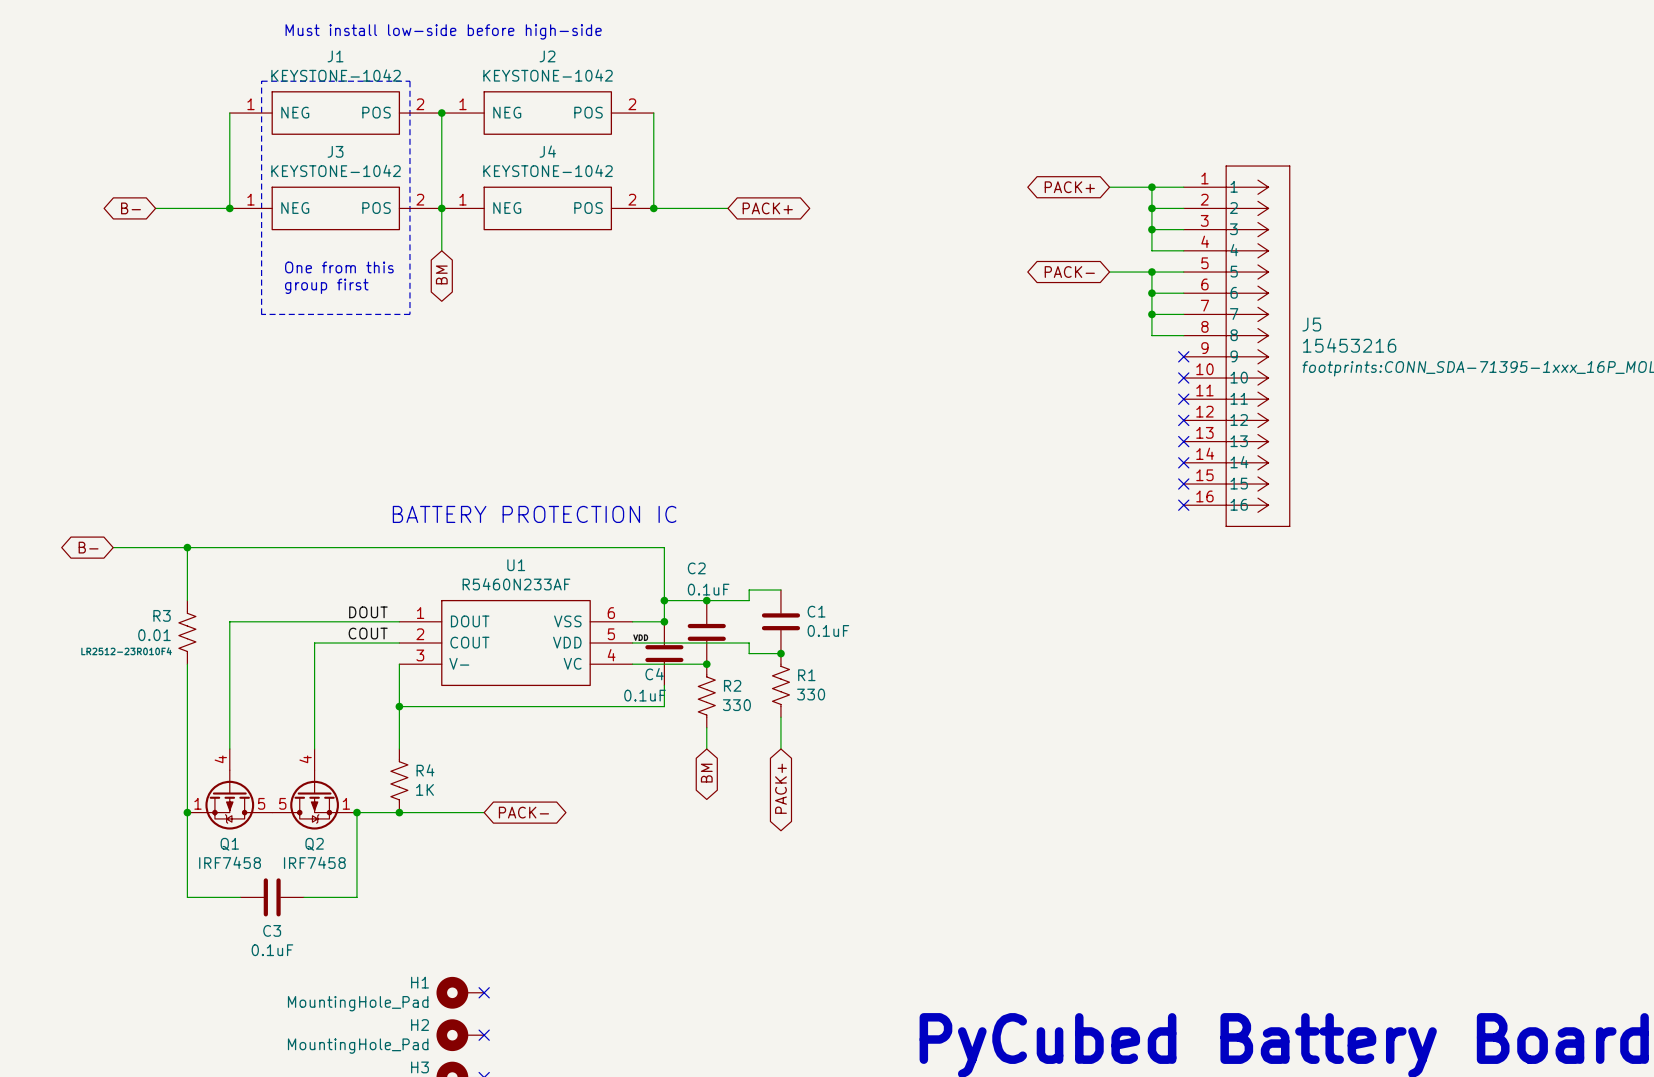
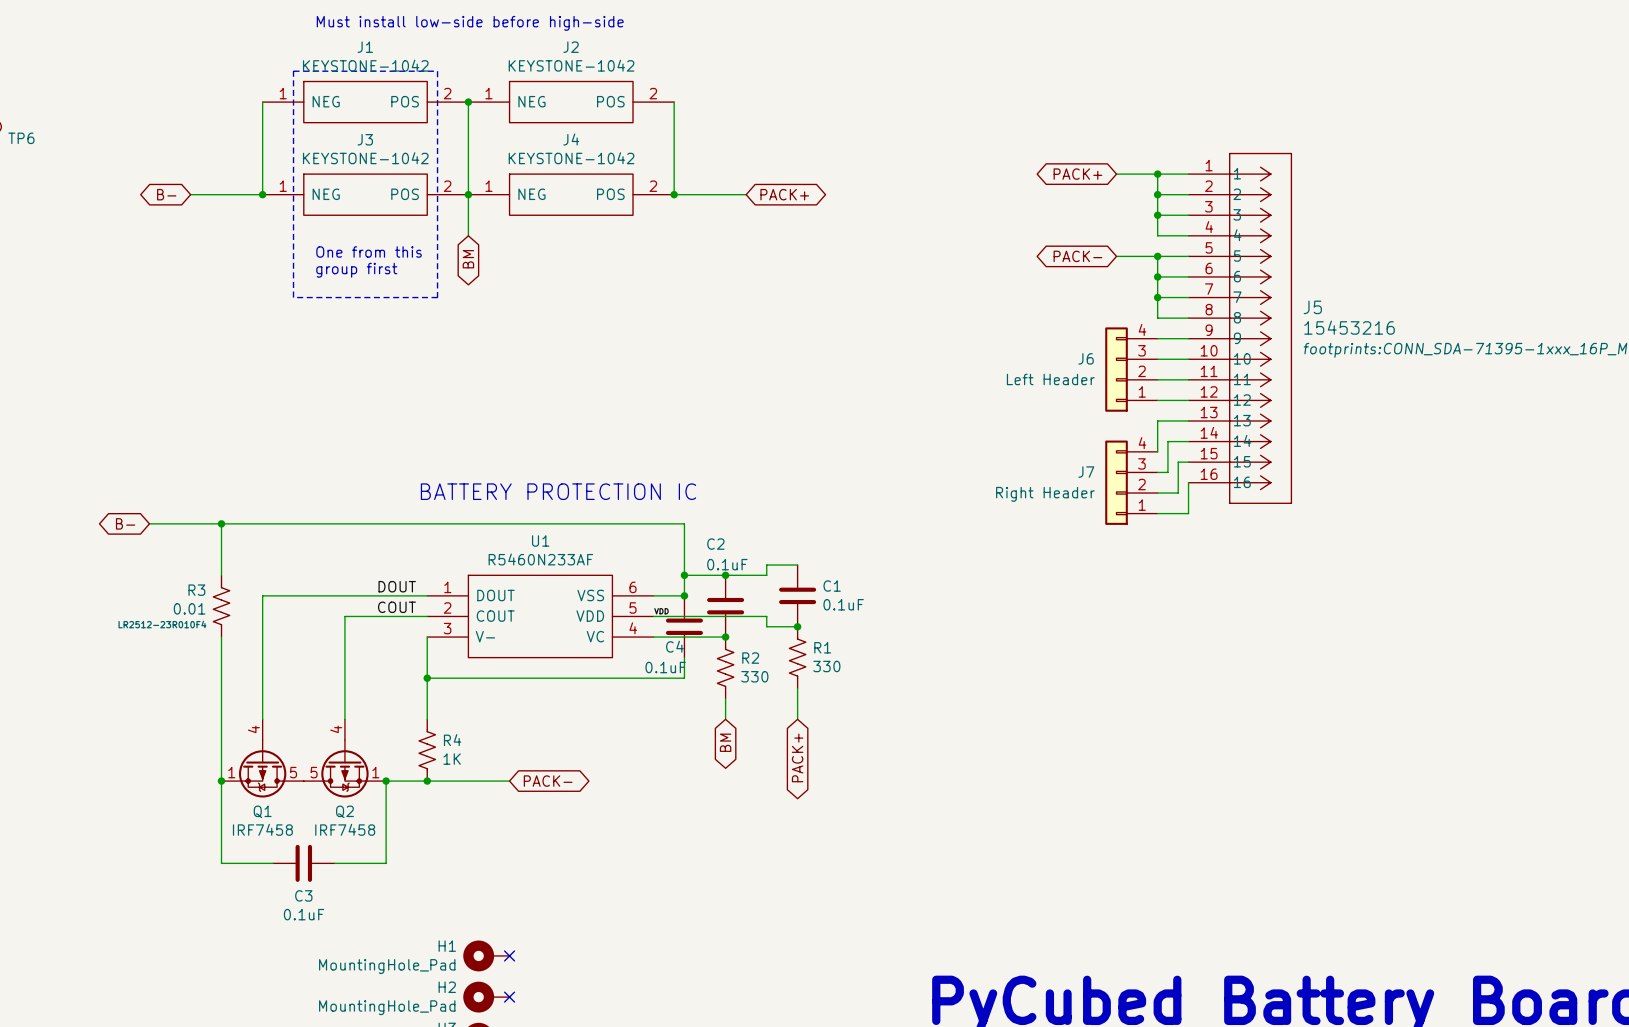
wire: none -> (1157, 338) (1188, 338)
no-connect mark: (1183, 356) -> none
wire: none -> (1157, 359) (1188, 359)
no-connect mark: (1183, 378) -> none
J6: none -> Left Header (1131, 369)
wire: none -> (1157, 379) (1188, 379)
no-connect mark: (1183, 399) -> none
wire: none -> (1157, 400) (1188, 400)
no-connect mark: (1183, 420) -> none
wire: none -> (1188, 421) (1157, 421) (1157, 451)
no-connect mark: (1183, 441) -> none
wire: none -> (1188, 441) (1167, 441) (1167, 472) (1157, 472)
no-connect mark: (1183, 462) -> none
wire: none -> (1188, 462) (1178, 462) (1178, 493) (1157, 493)
no-connect mark: (1183, 484) -> none
J7: none -> Right Header (1131, 482)
wire: none -> (1188, 482) (1188, 513) (1157, 513)
no-connect mark: (1183, 505) -> none

